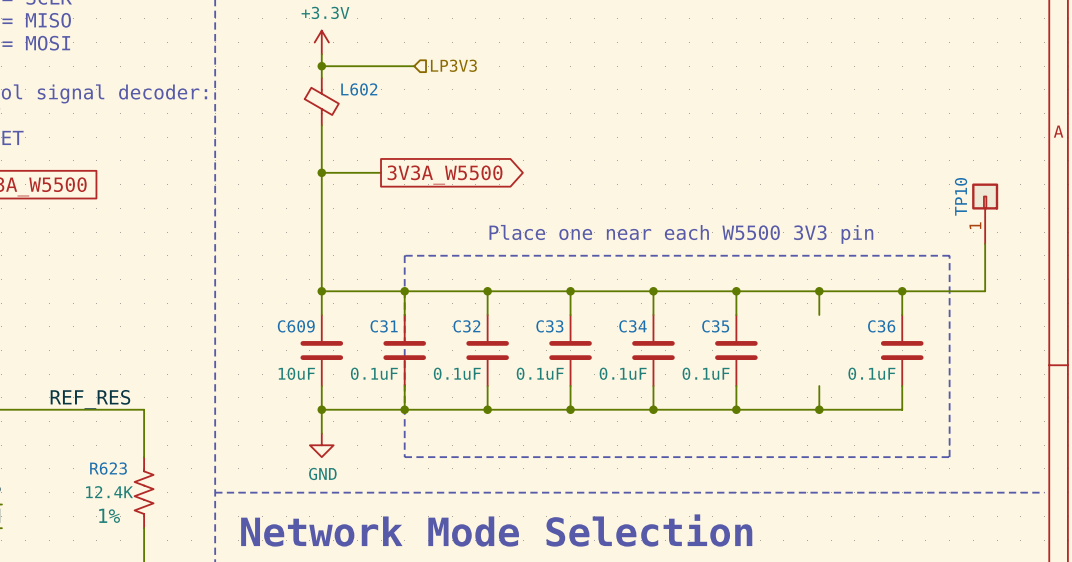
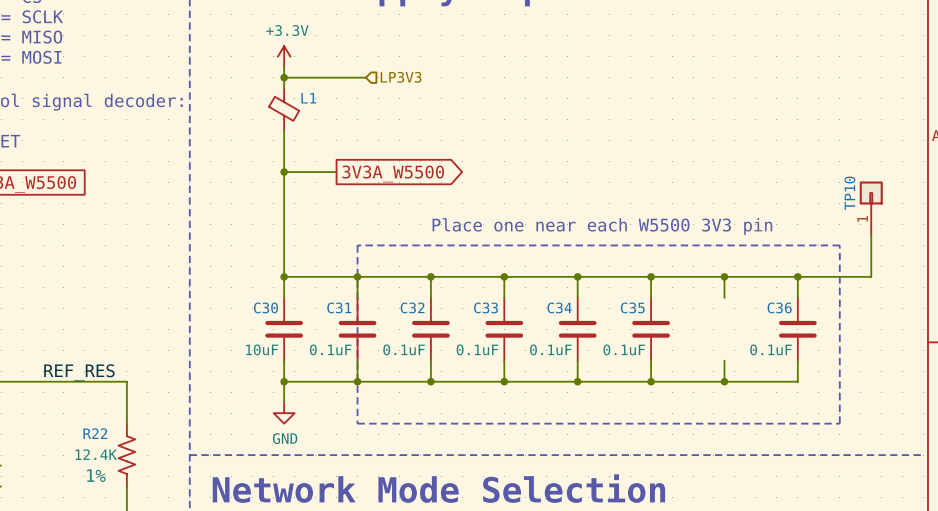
L602 name: L602 (359, 89) -> L1 (308, 98)
C609 name: C609 (296, 326) -> C30 (265, 307)
R623 name: R623 (108, 468) -> R22 (95, 433)

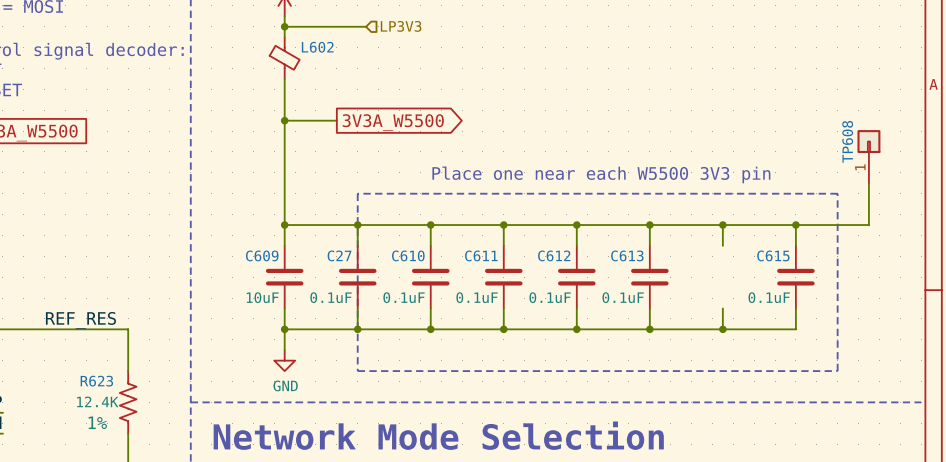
L1 name: L1 (308, 98) -> L602 (317, 47)
TP10 name: TP10 (849, 193) -> TP608 (847, 141)
C30 name: C30 (265, 307) -> C609 (262, 255)
C31 name: C31 (339, 307) -> C27 (339, 255)
C32 name: C32 (412, 307) -> C610 (408, 255)
C33 name: C33 (486, 307) -> C611 (481, 255)
C34 name: C34 (559, 307) -> C612 (554, 255)
C35 name: C35 (632, 307) -> C613 (627, 255)
C36 name: C36 (779, 307) -> C615 (773, 255)
R22 name: R22 (95, 433) -> R623 (96, 381)

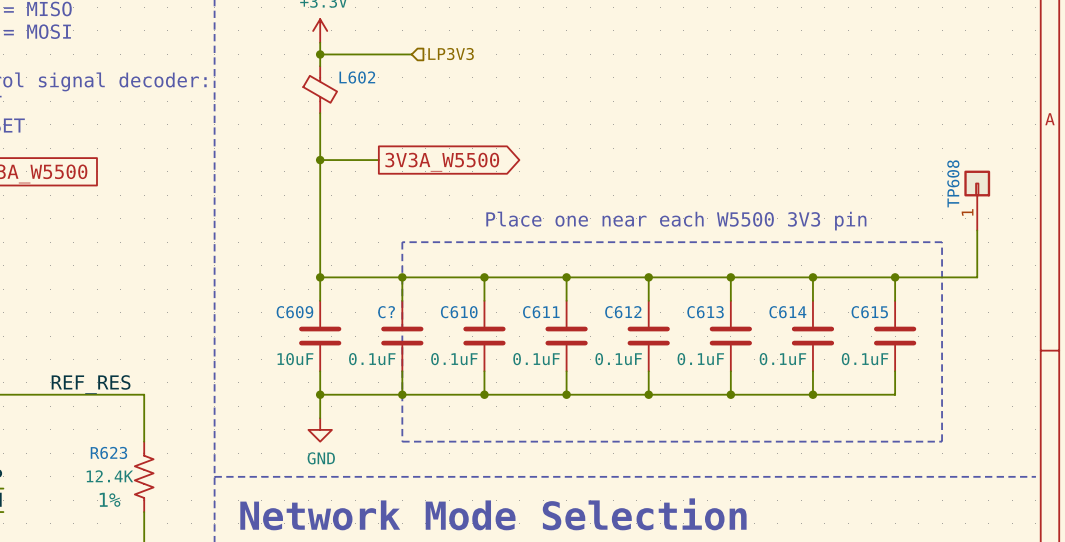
C27 name: C27 (339, 255) -> C? (386, 312)
C614: none -> 0.1uF (812, 336)

